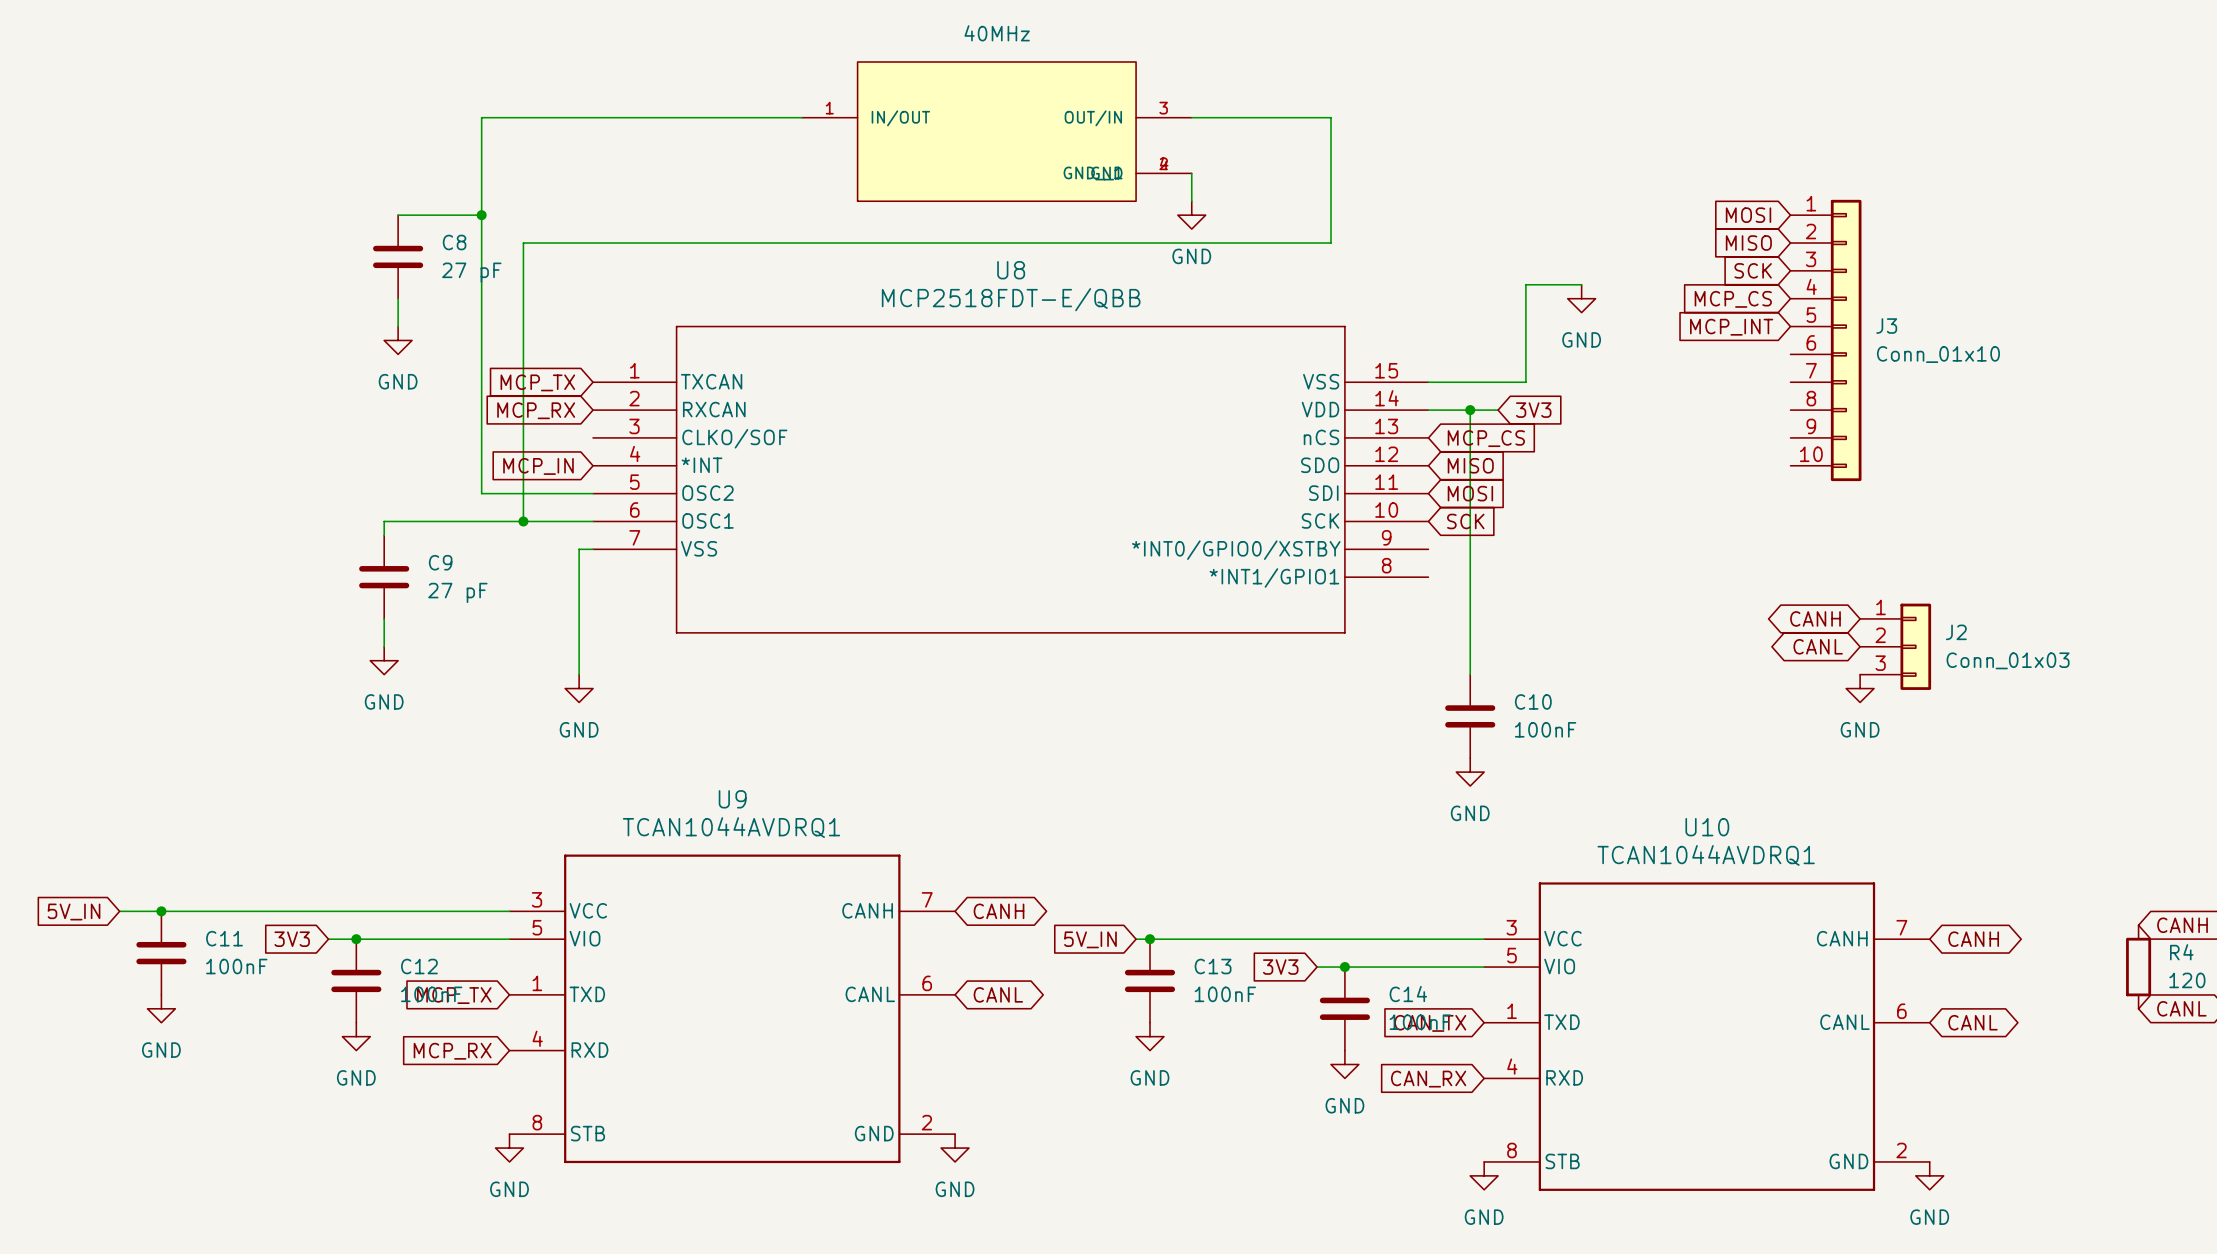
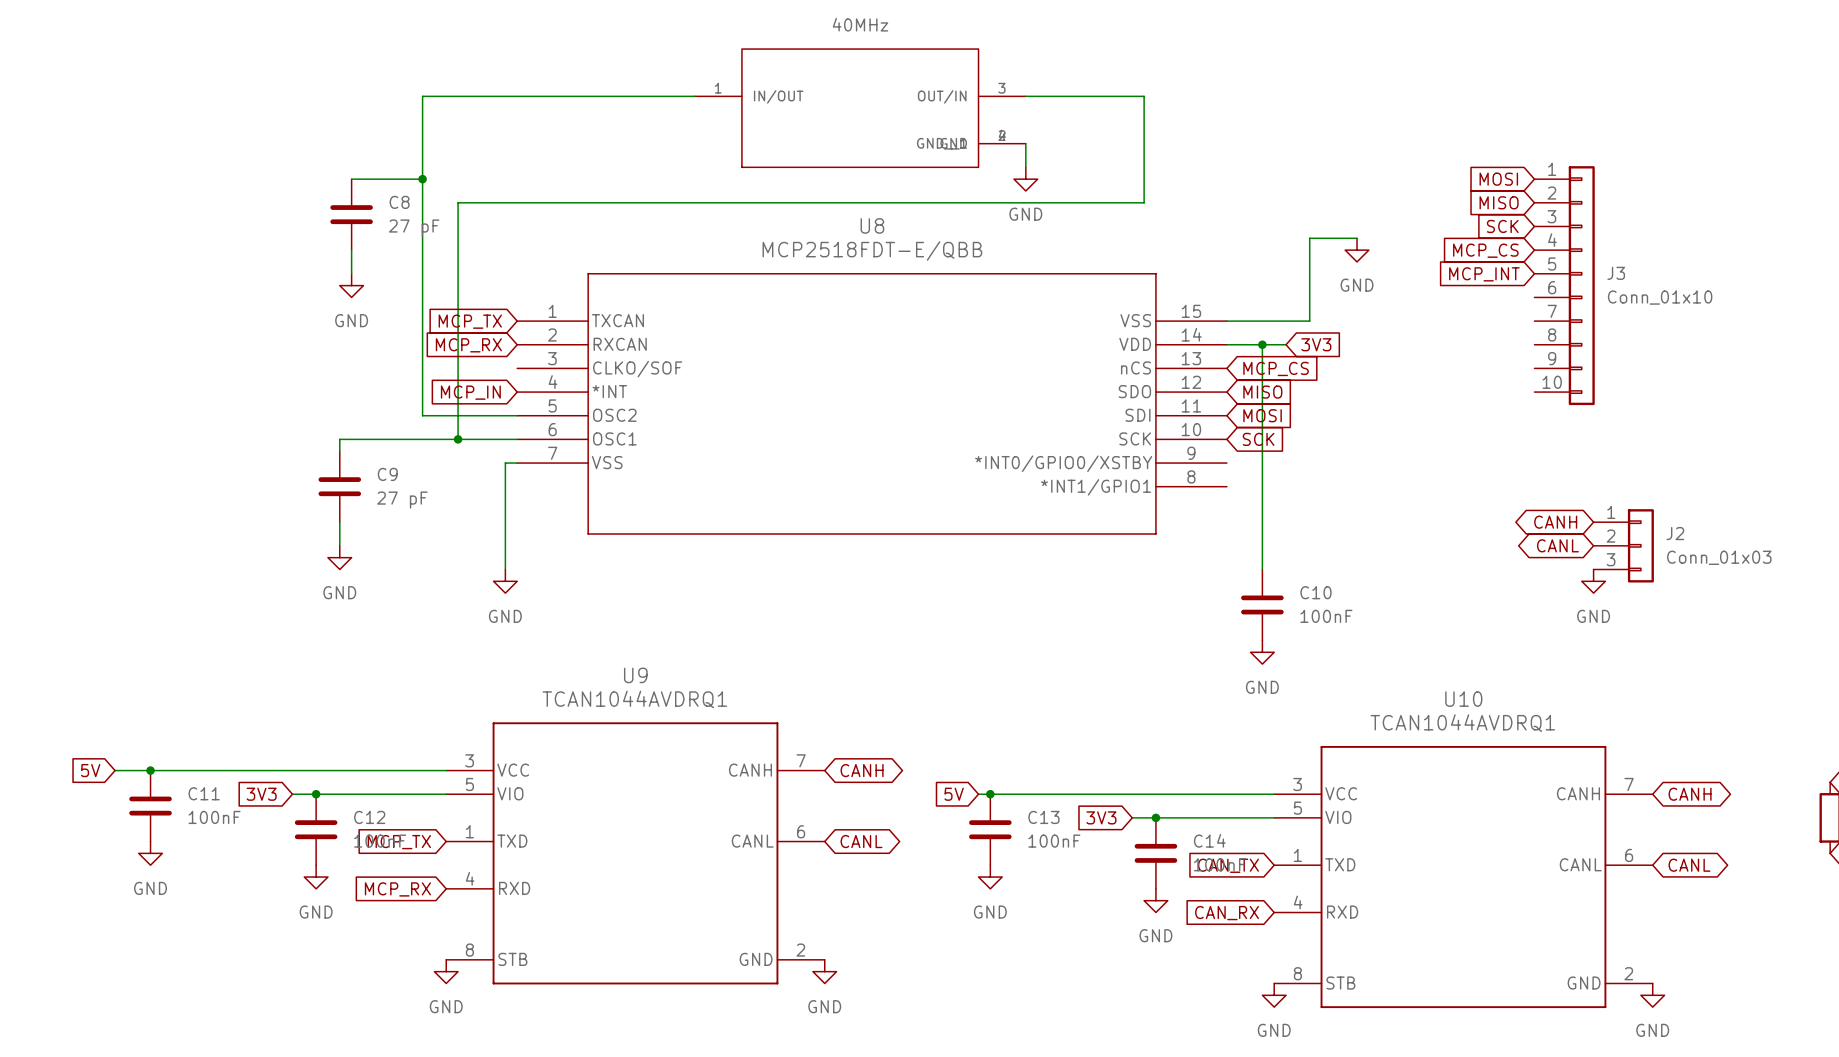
global label: 5V_IN (74, 912) -> 5V (90, 770)
global label: 5V_IN (1090, 939) -> 5V (954, 794)

